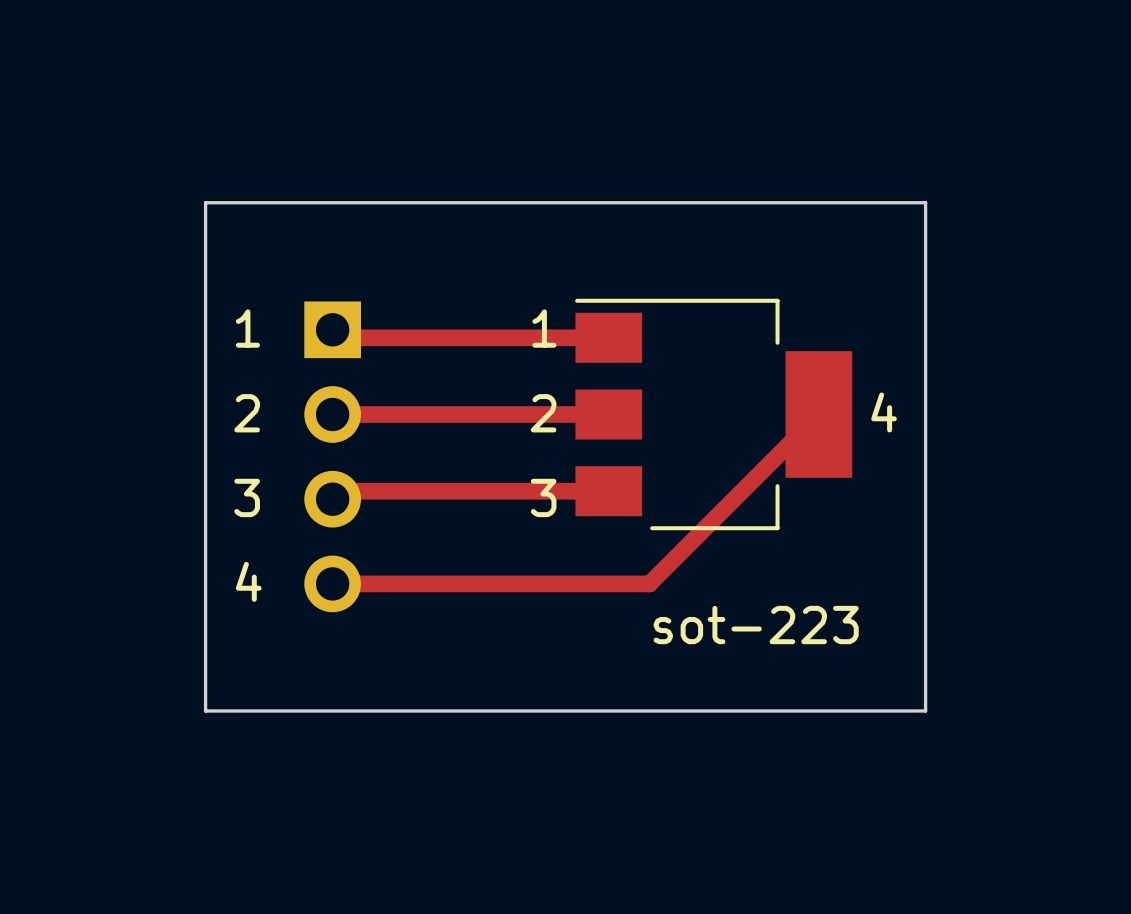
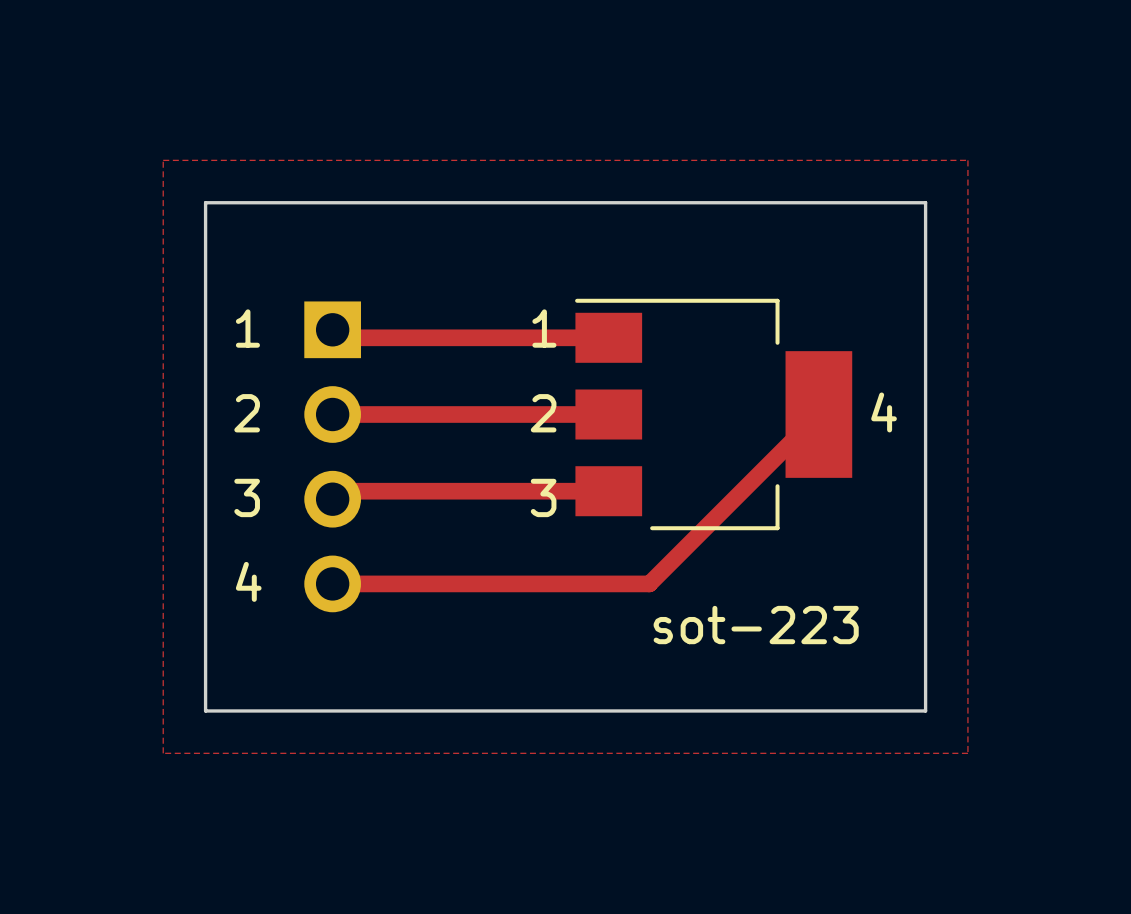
top zone outline: none -> (163, 160) (163, 753) (967, 753) (967, 160) (163, 160)

